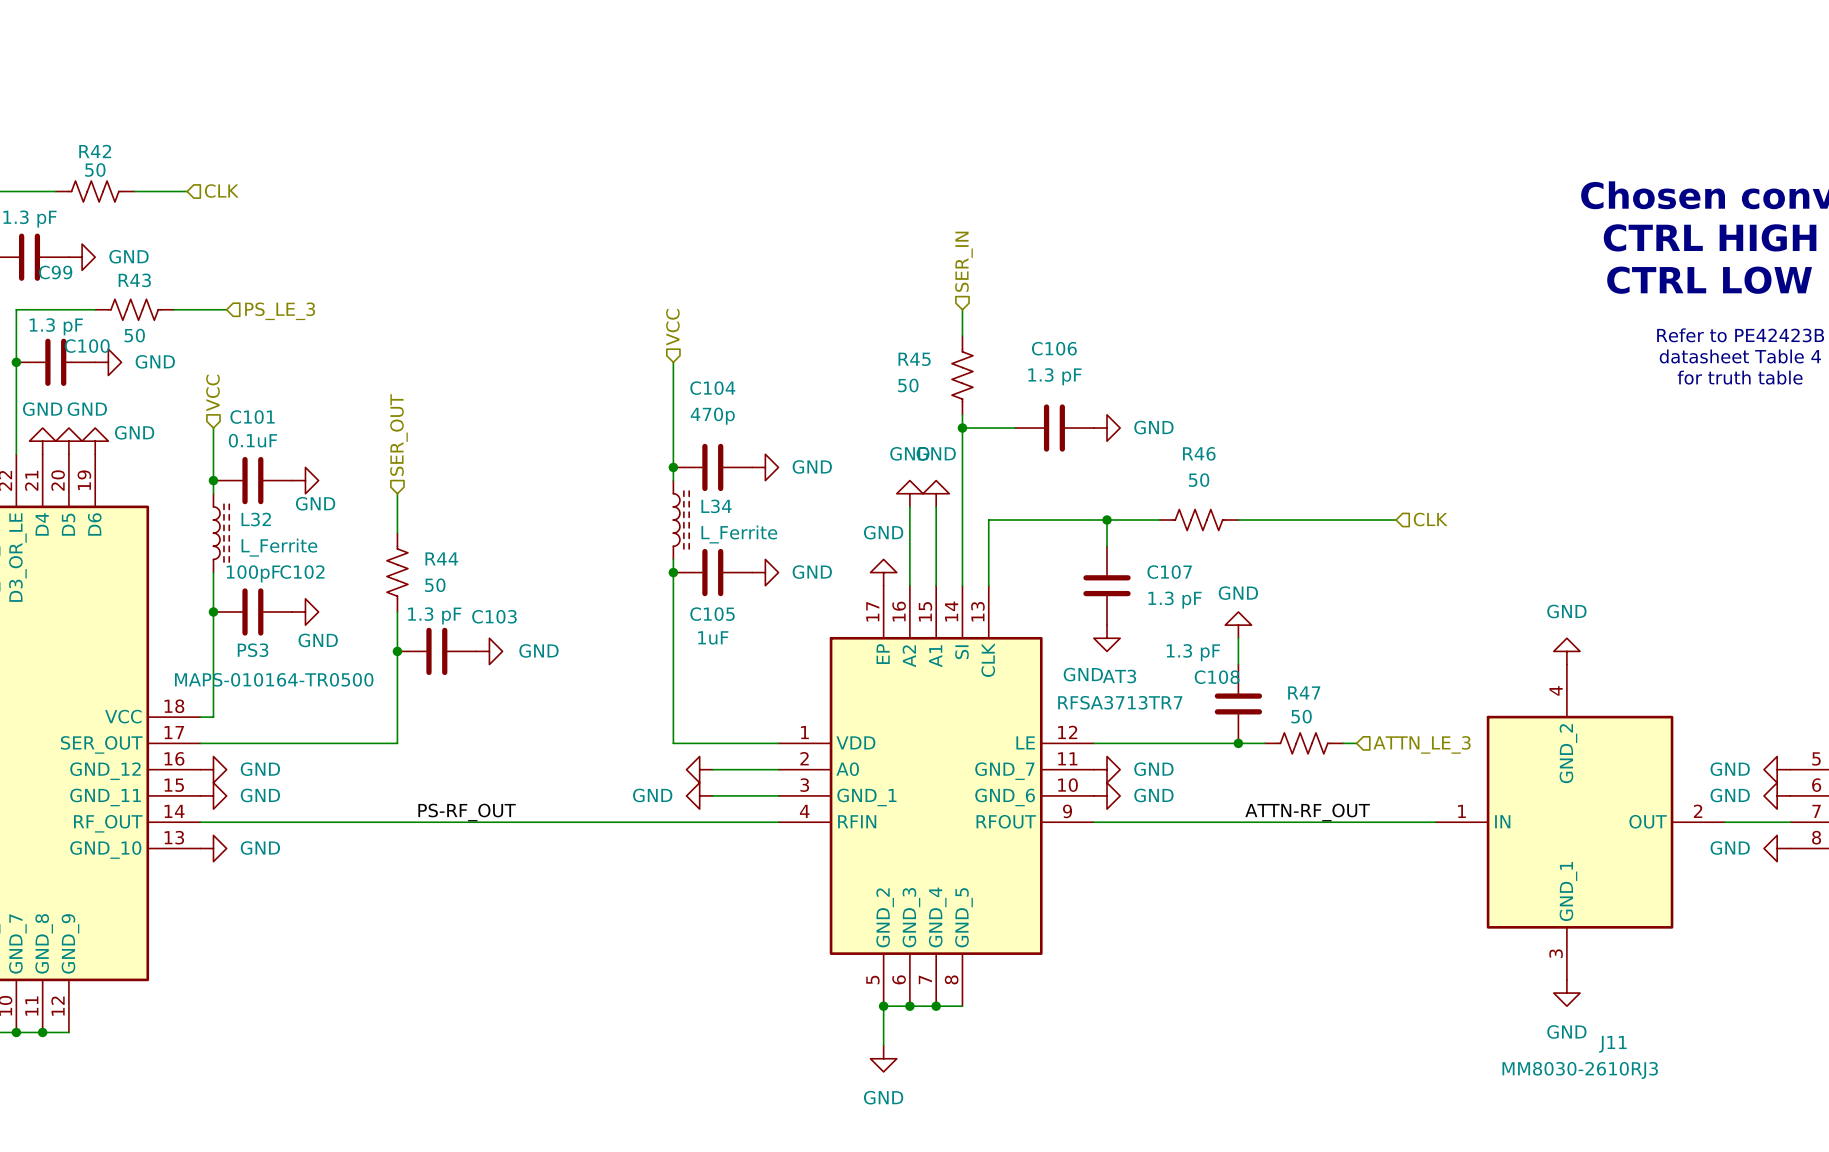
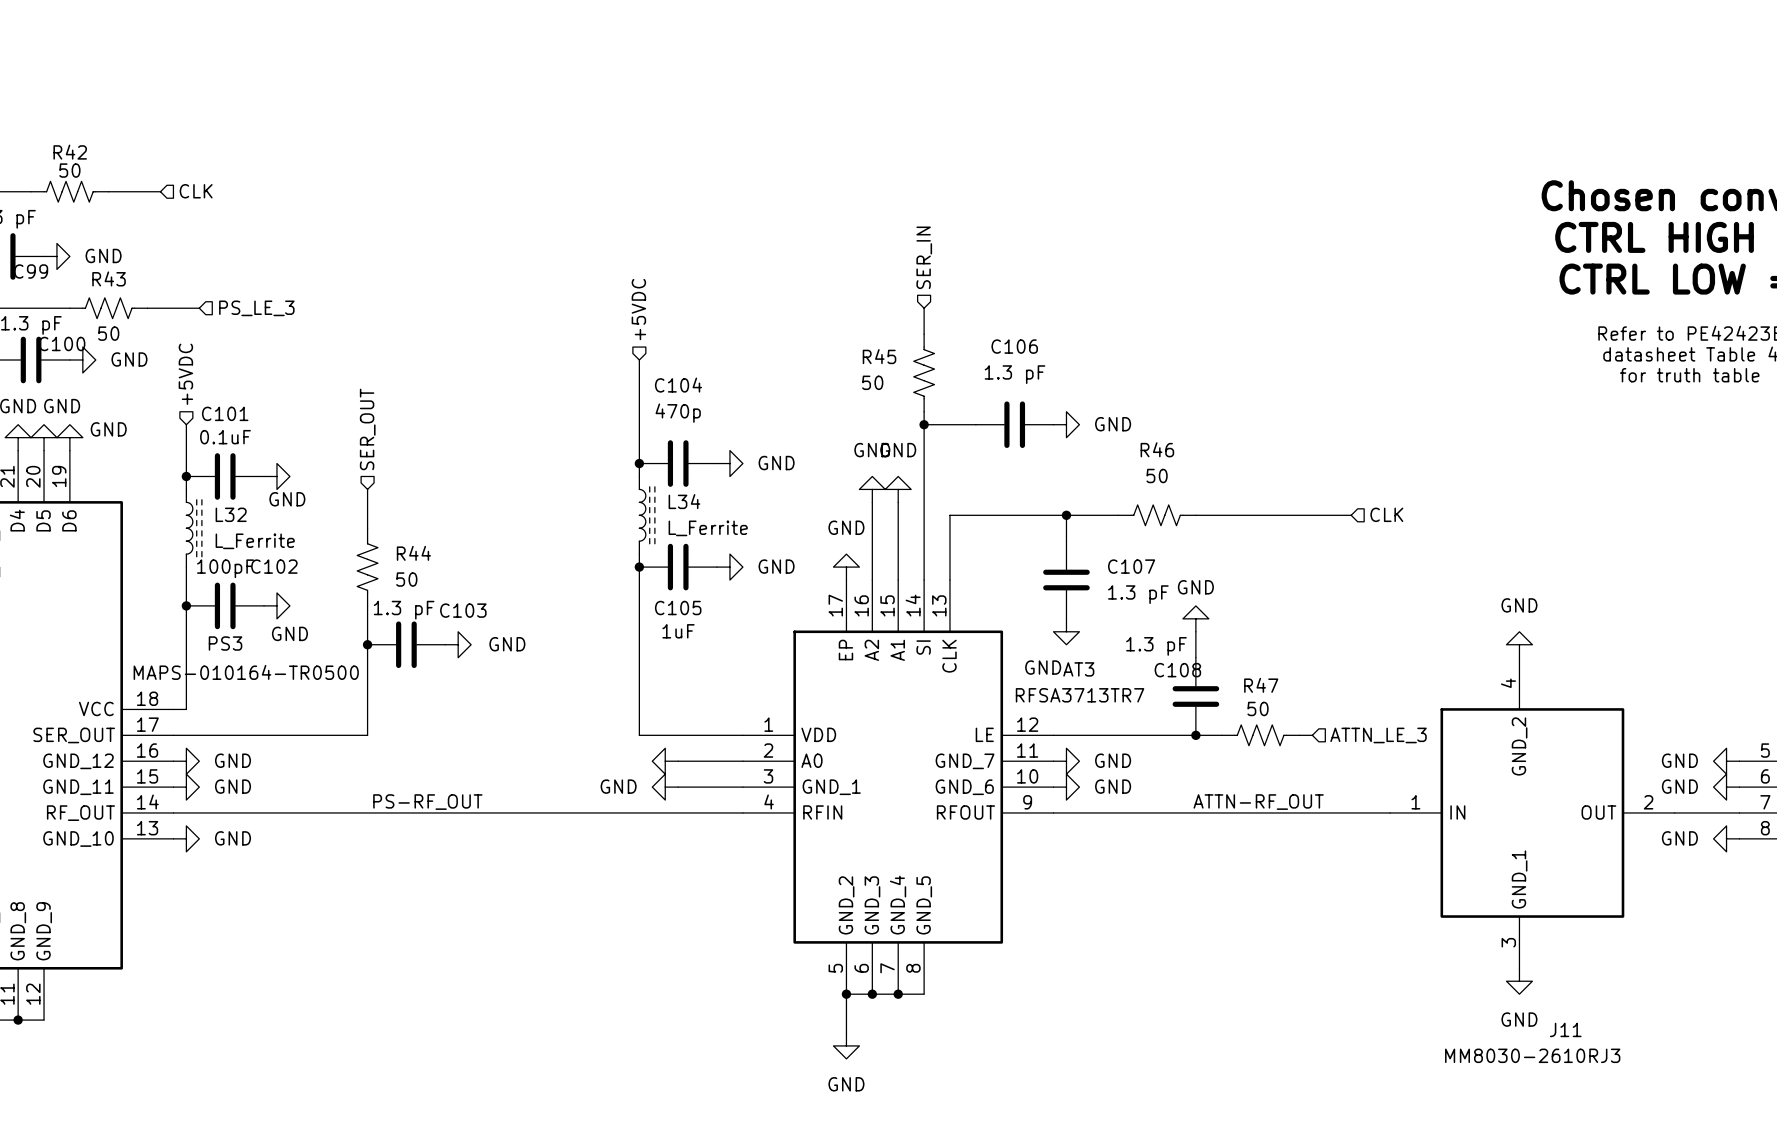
hierarchical label: VCC (672, 327) -> +5VDC (638, 309)
hierarchical label: VCC (212, 393) -> +5VDC (185, 374)

